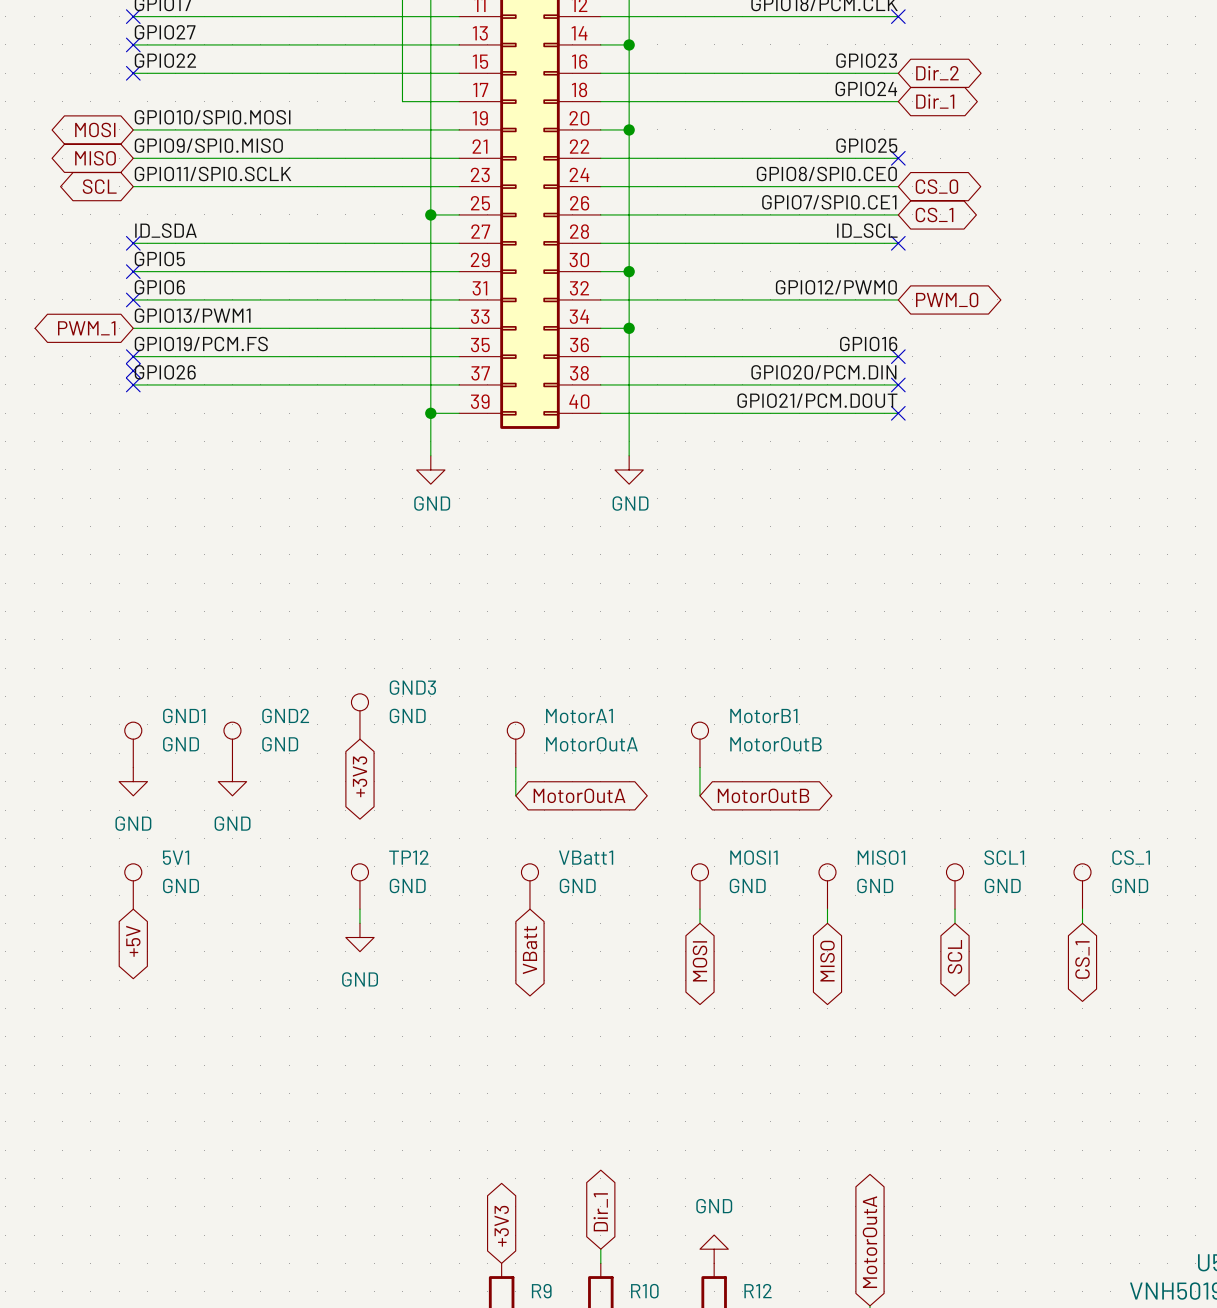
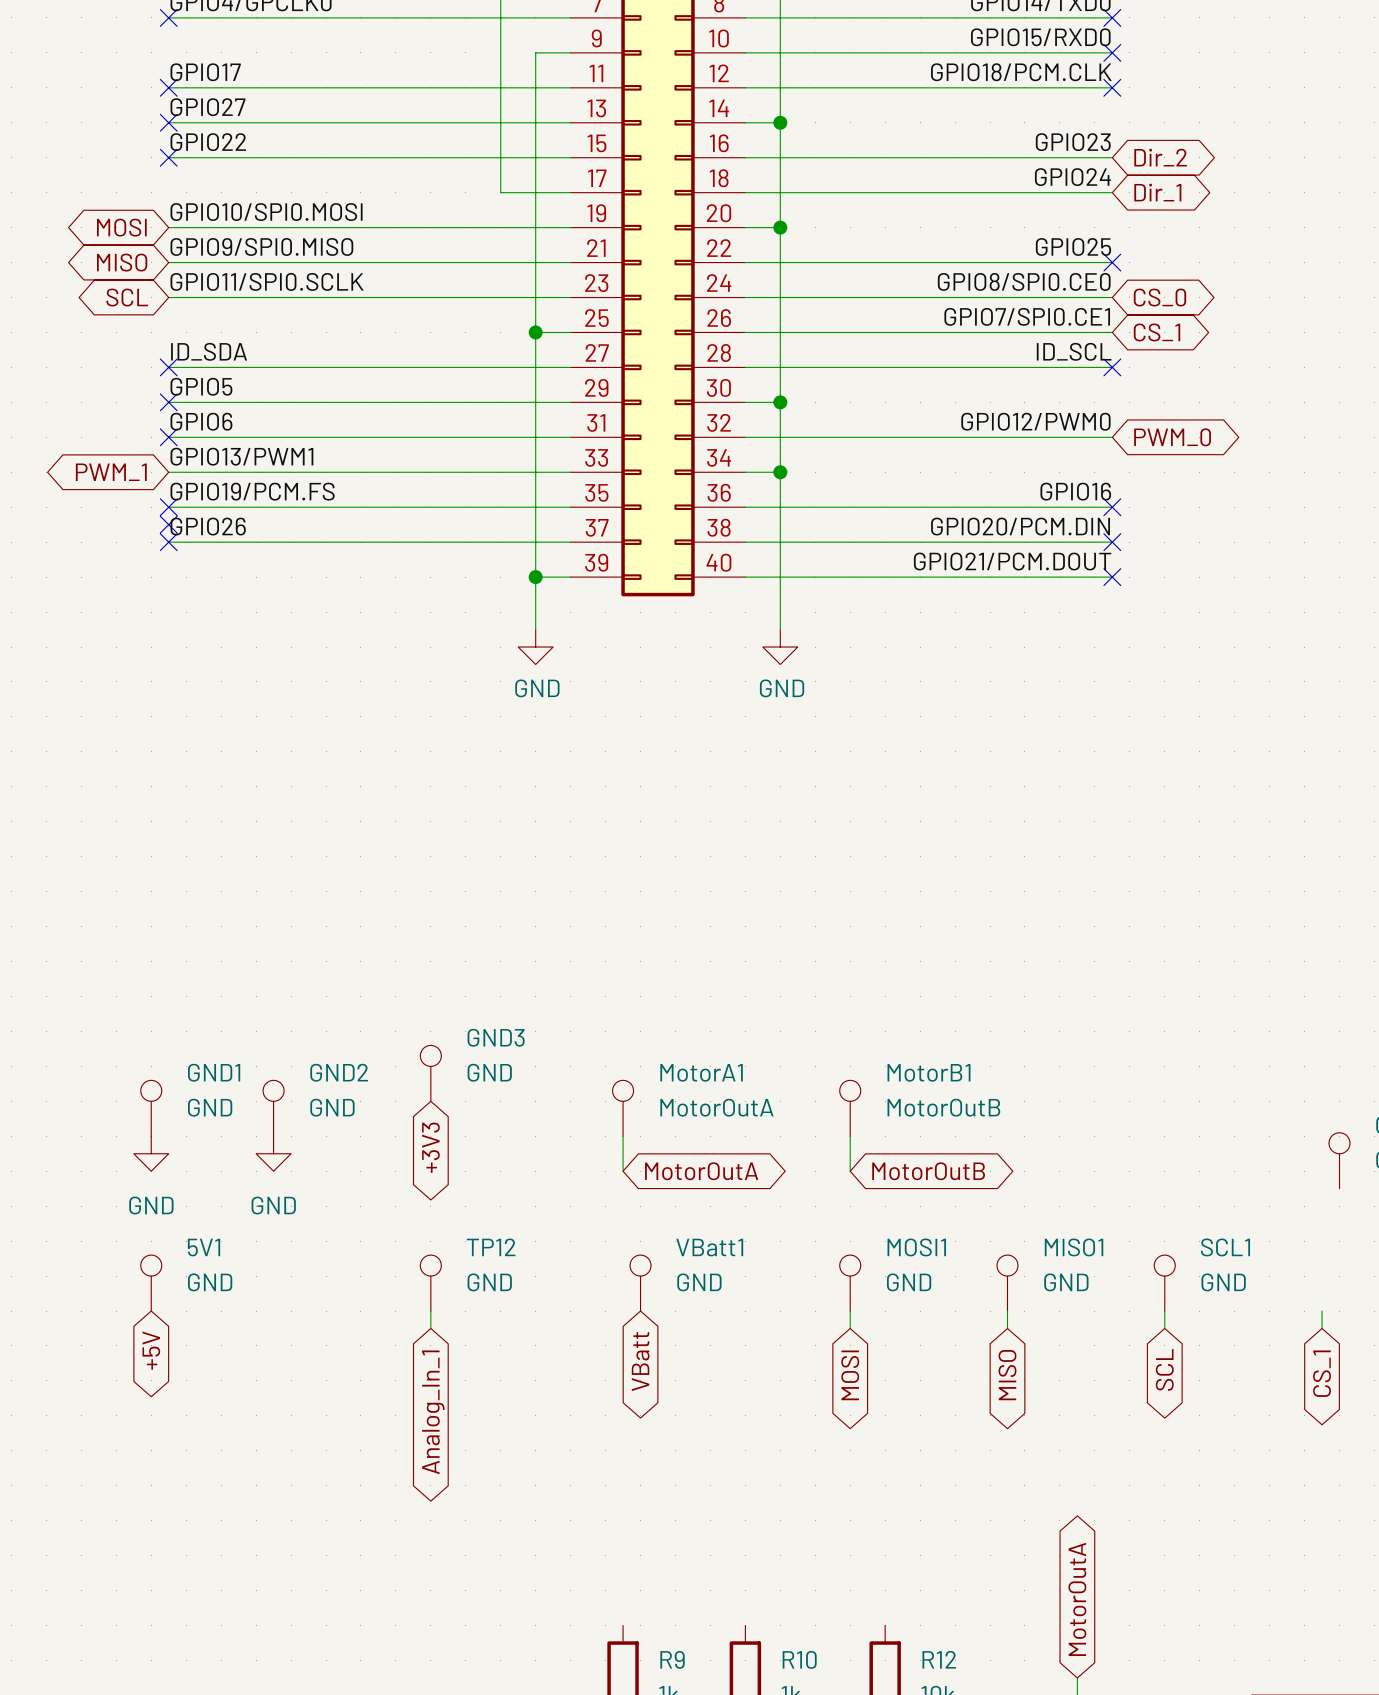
GND3 position: (359, 716) -> (430, 1073)
GND1 position: (133, 744) -> (151, 1108)
GND2 position: (232, 744) -> (273, 1108)
MotorA1 position: (515, 744) -> (623, 1108)
MotorB1 position: (699, 744) -> (850, 1108)
wire: (515, 767) (515, 795) -> (623, 1136) (623, 1171)
wire: (699, 767) (699, 795) -> (850, 1136) (850, 1171)
global label position: +3V3 (360, 776) -> +3V3 (430, 1147)
power symbol: GND (133, 781) -> none
power symbol: GND (232, 781) -> none
global label position: MotorOutA (579, 795) -> MotorOutA (701, 1171)
global label position: MotorOutB (763, 795) -> MotorOutB (928, 1171)
power symbol: none -> GND (151, 1153)
power symbol: none -> GND (273, 1153)
5V1 position: (133, 886) -> (151, 1283)
TP12 position: (359, 886) -> (430, 1283)
VBatt1 position: (529, 886) -> (640, 1283)
MOSI1 position: (699, 886) -> (850, 1283)
MISO1 position: (827, 886) -> (1007, 1283)
SCL1 position: (954, 886) -> (1164, 1283)
wire: (359, 909) (359, 923) -> (430, 1311) (430, 1328)
wire: (699, 909) (699, 923) -> (850, 1311) (850, 1328)
wire: (827, 909) (827, 923) -> (1007, 1311) (1007, 1328)
wire: (954, 909) (954, 923) -> (1164, 1311) (1164, 1328)
wire: (1082, 909) (1082, 923) -> (1322, 1311) (1322, 1328)
power symbol: GND (359, 937) -> none
global label position: +5V (133, 941) -> +5V (151, 1350)
global label position: VBatt (530, 950) -> VBatt (640, 1361)
global label position: SCL (955, 956) -> SCL (1164, 1369)
global label position: CS_1 (1082, 959) -> CS_1 (1322, 1373)
global label position: MOSI (699, 961) -> MOSI (850, 1375)
global label position: MISO (827, 961) -> MISO (1007, 1375)
global label: none -> Analog_In_1 (433, 1412)
global label: Dir_1 (600, 1212) -> none
global label: +3V3 (501, 1226) -> none
wire: (600, 1249) (600, 1263) -> none
power symbol: GND (714, 1249) -> none

